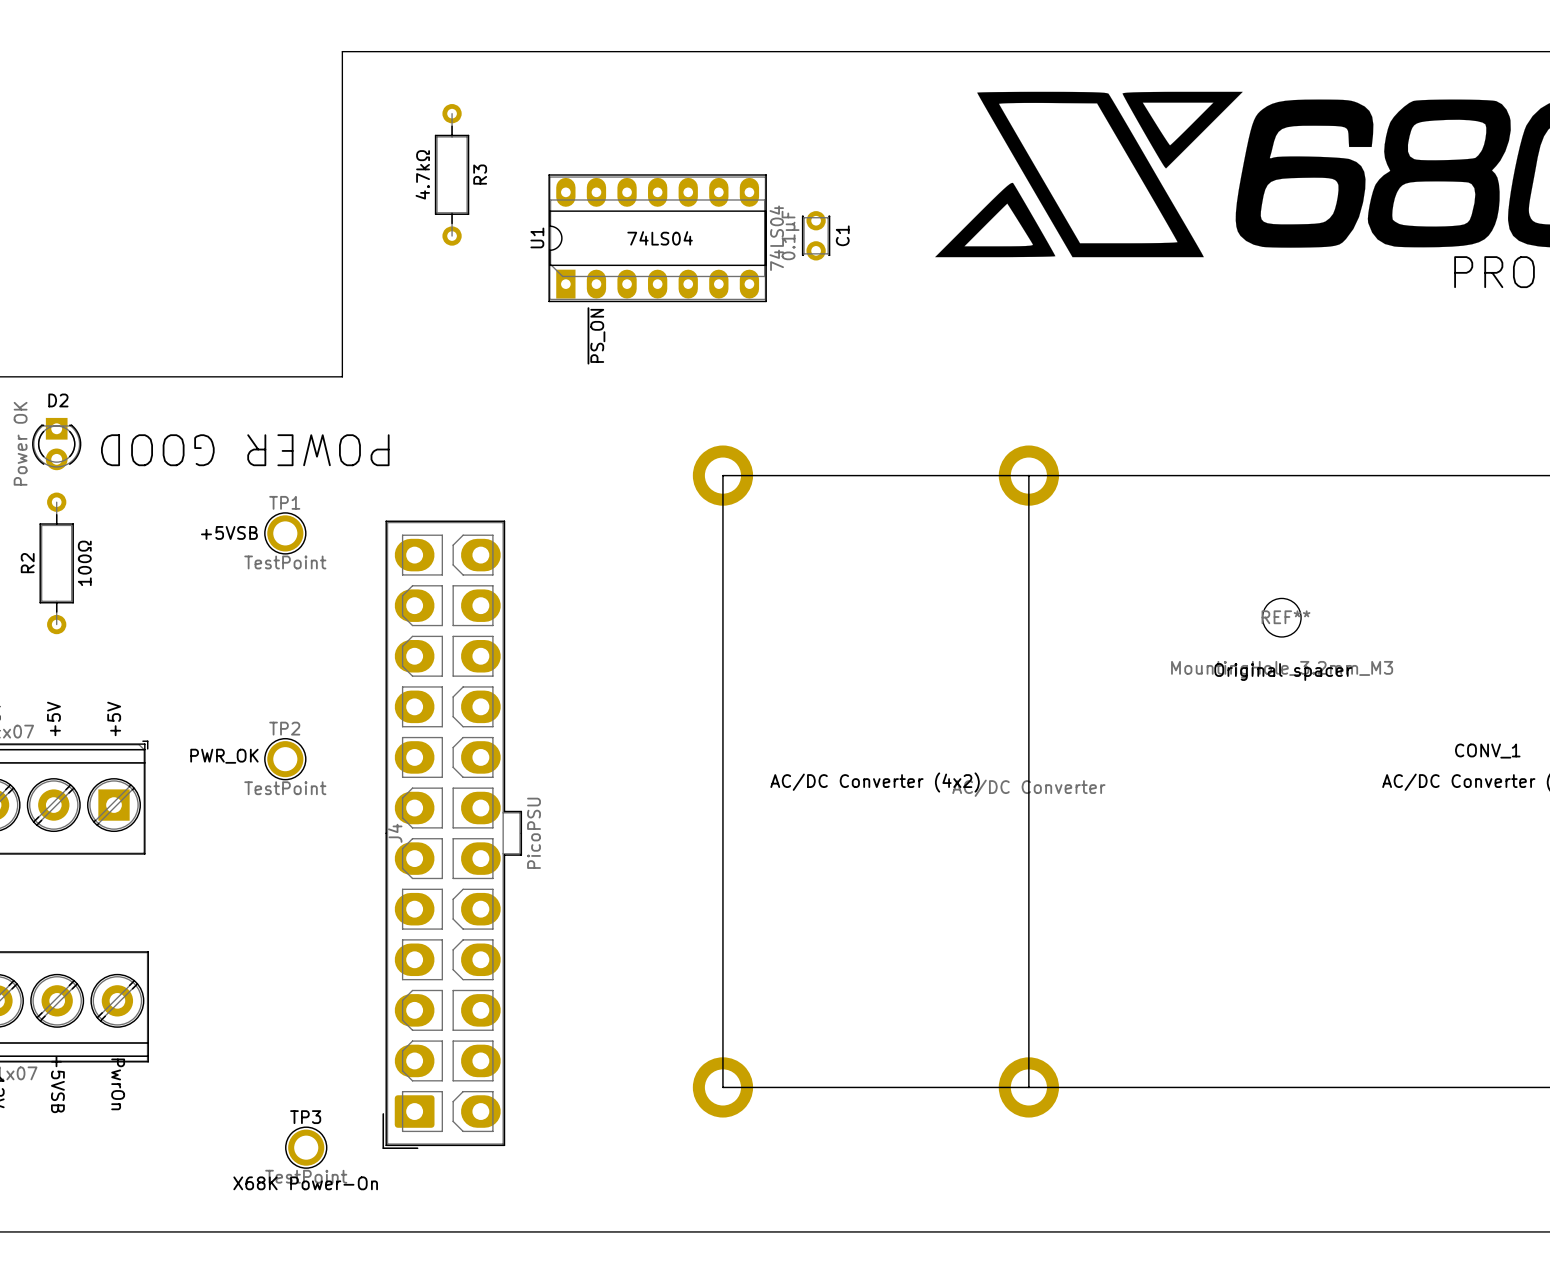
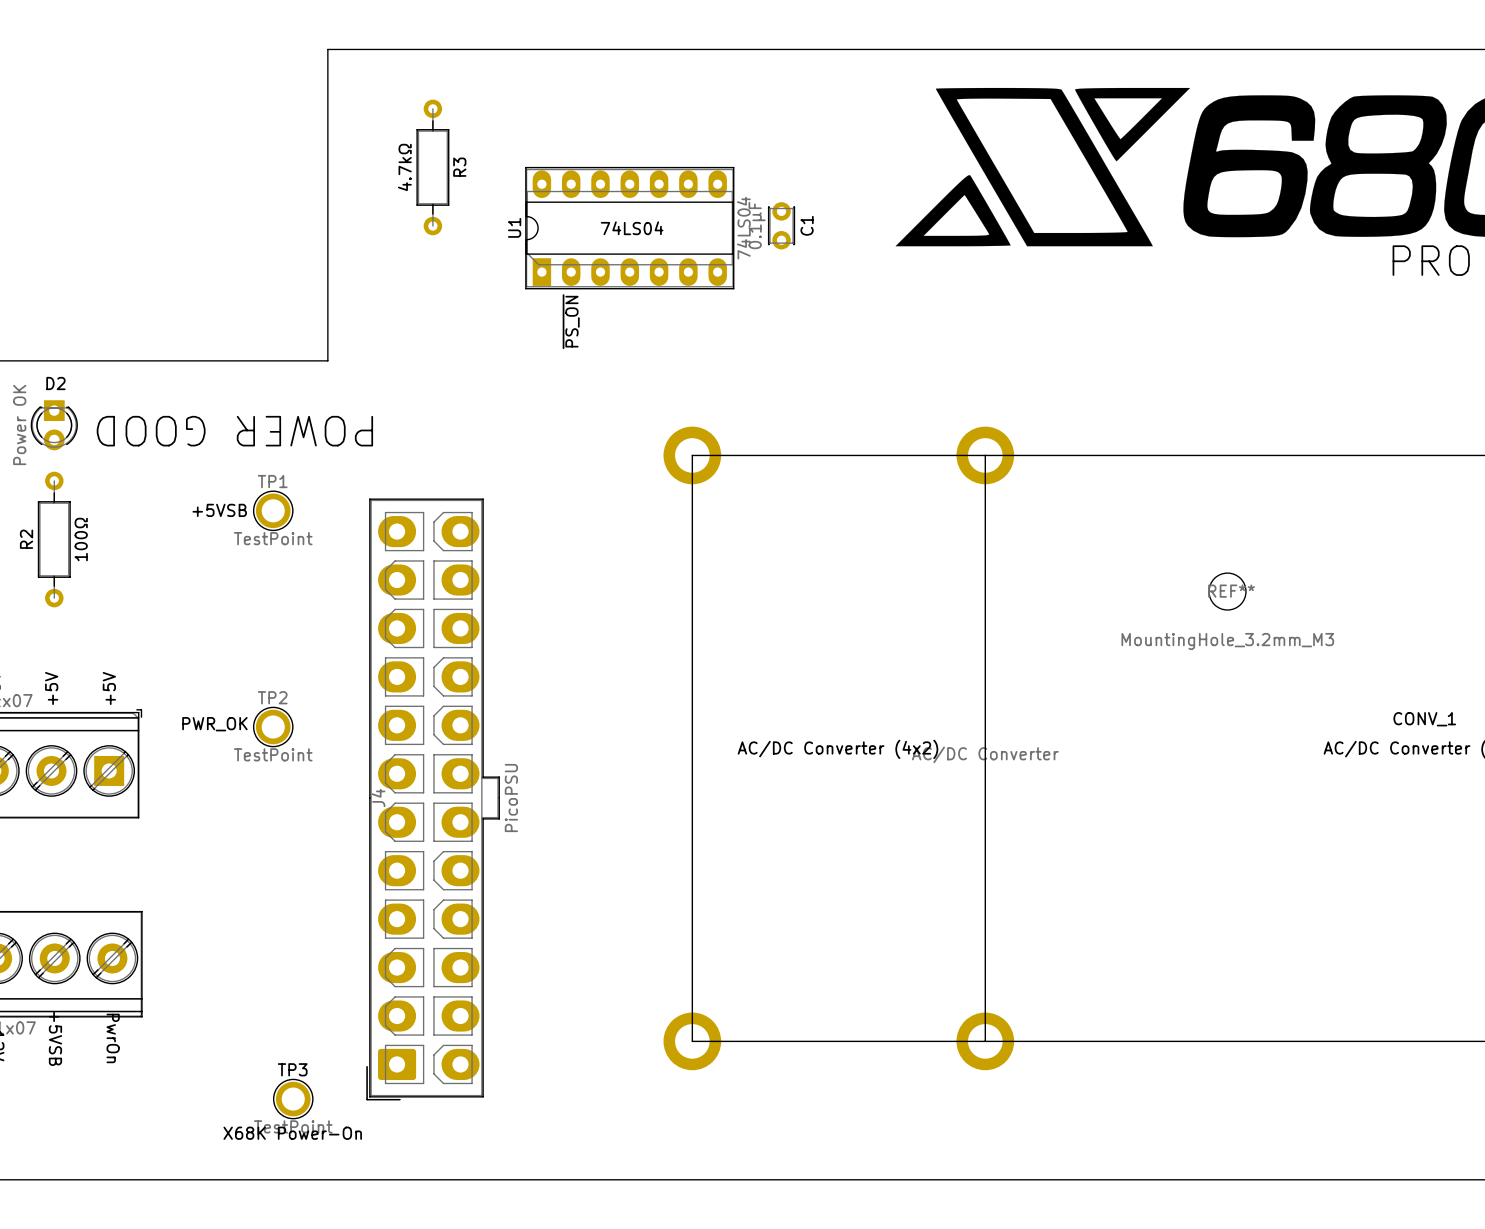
text: Original spacer (1283, 672) -> none

